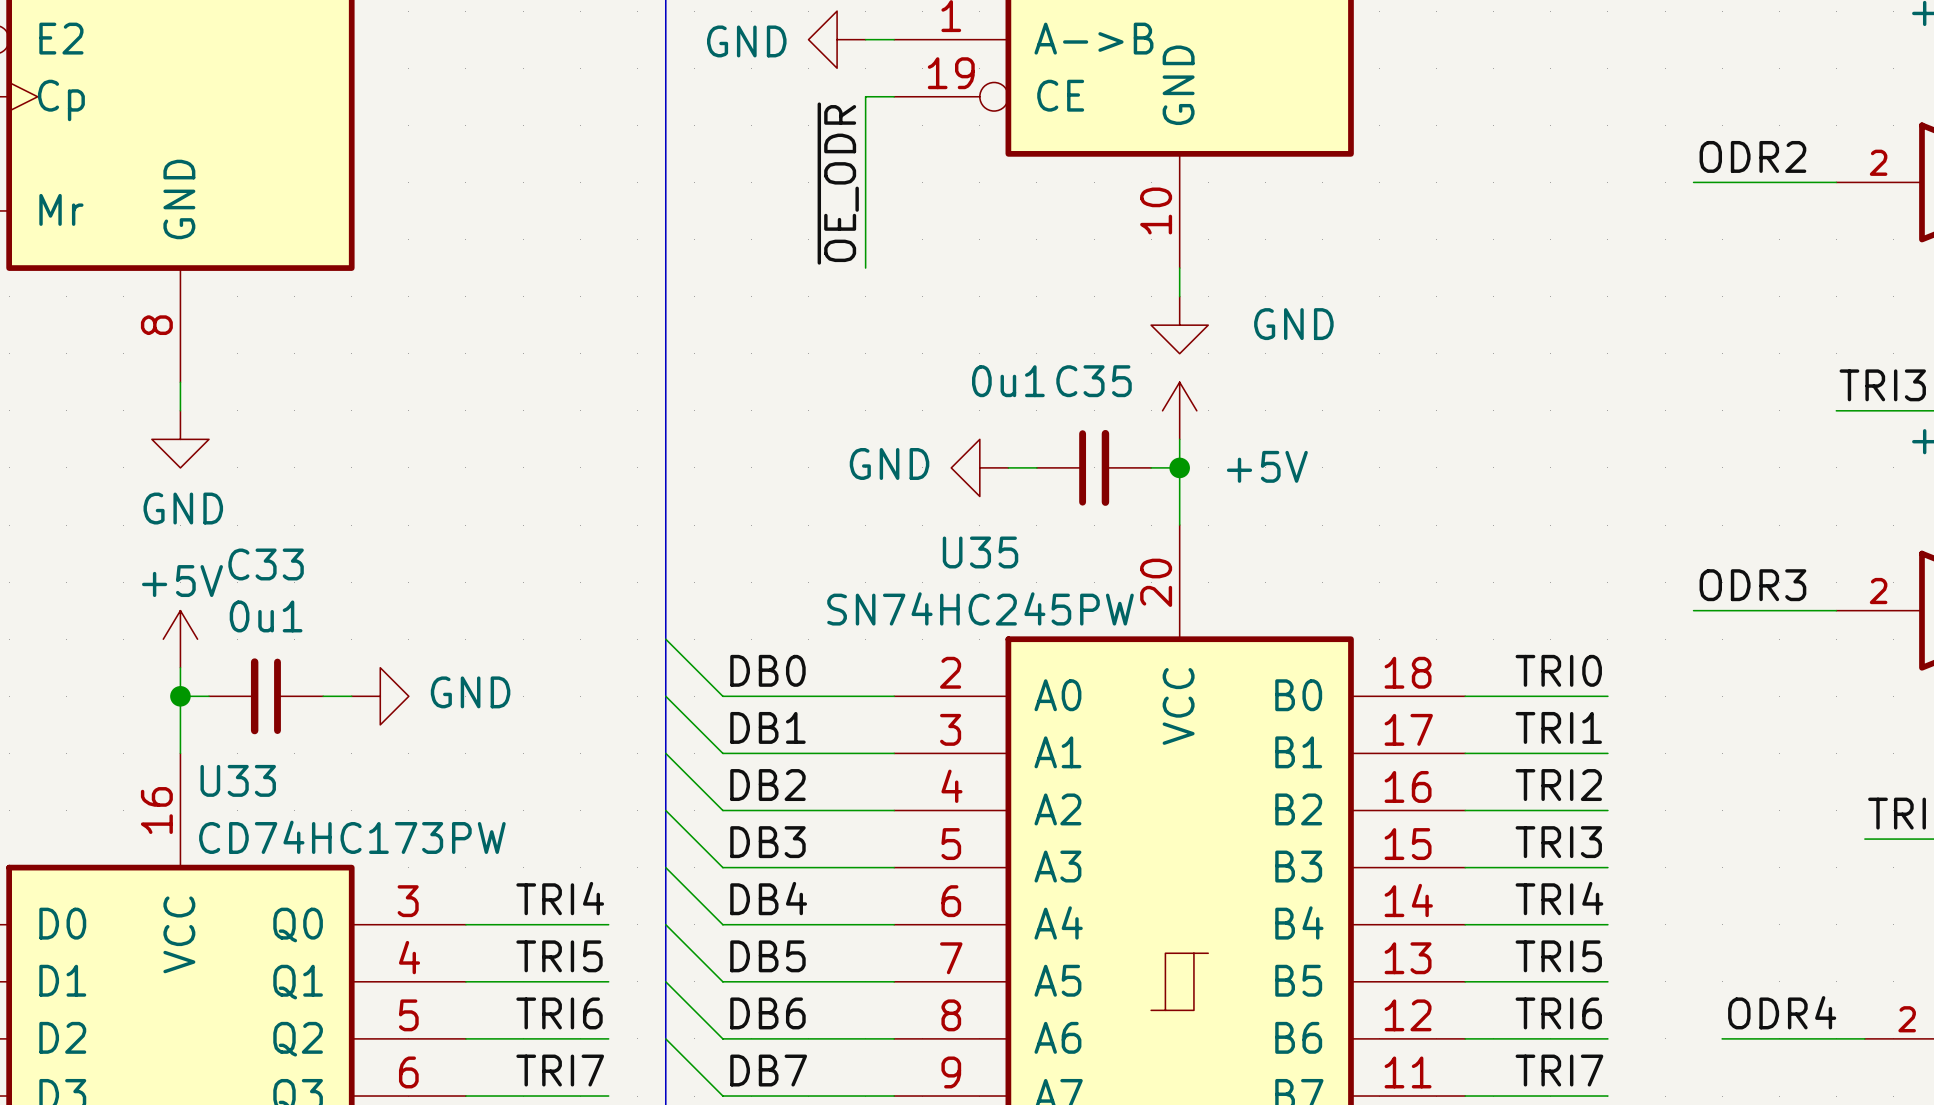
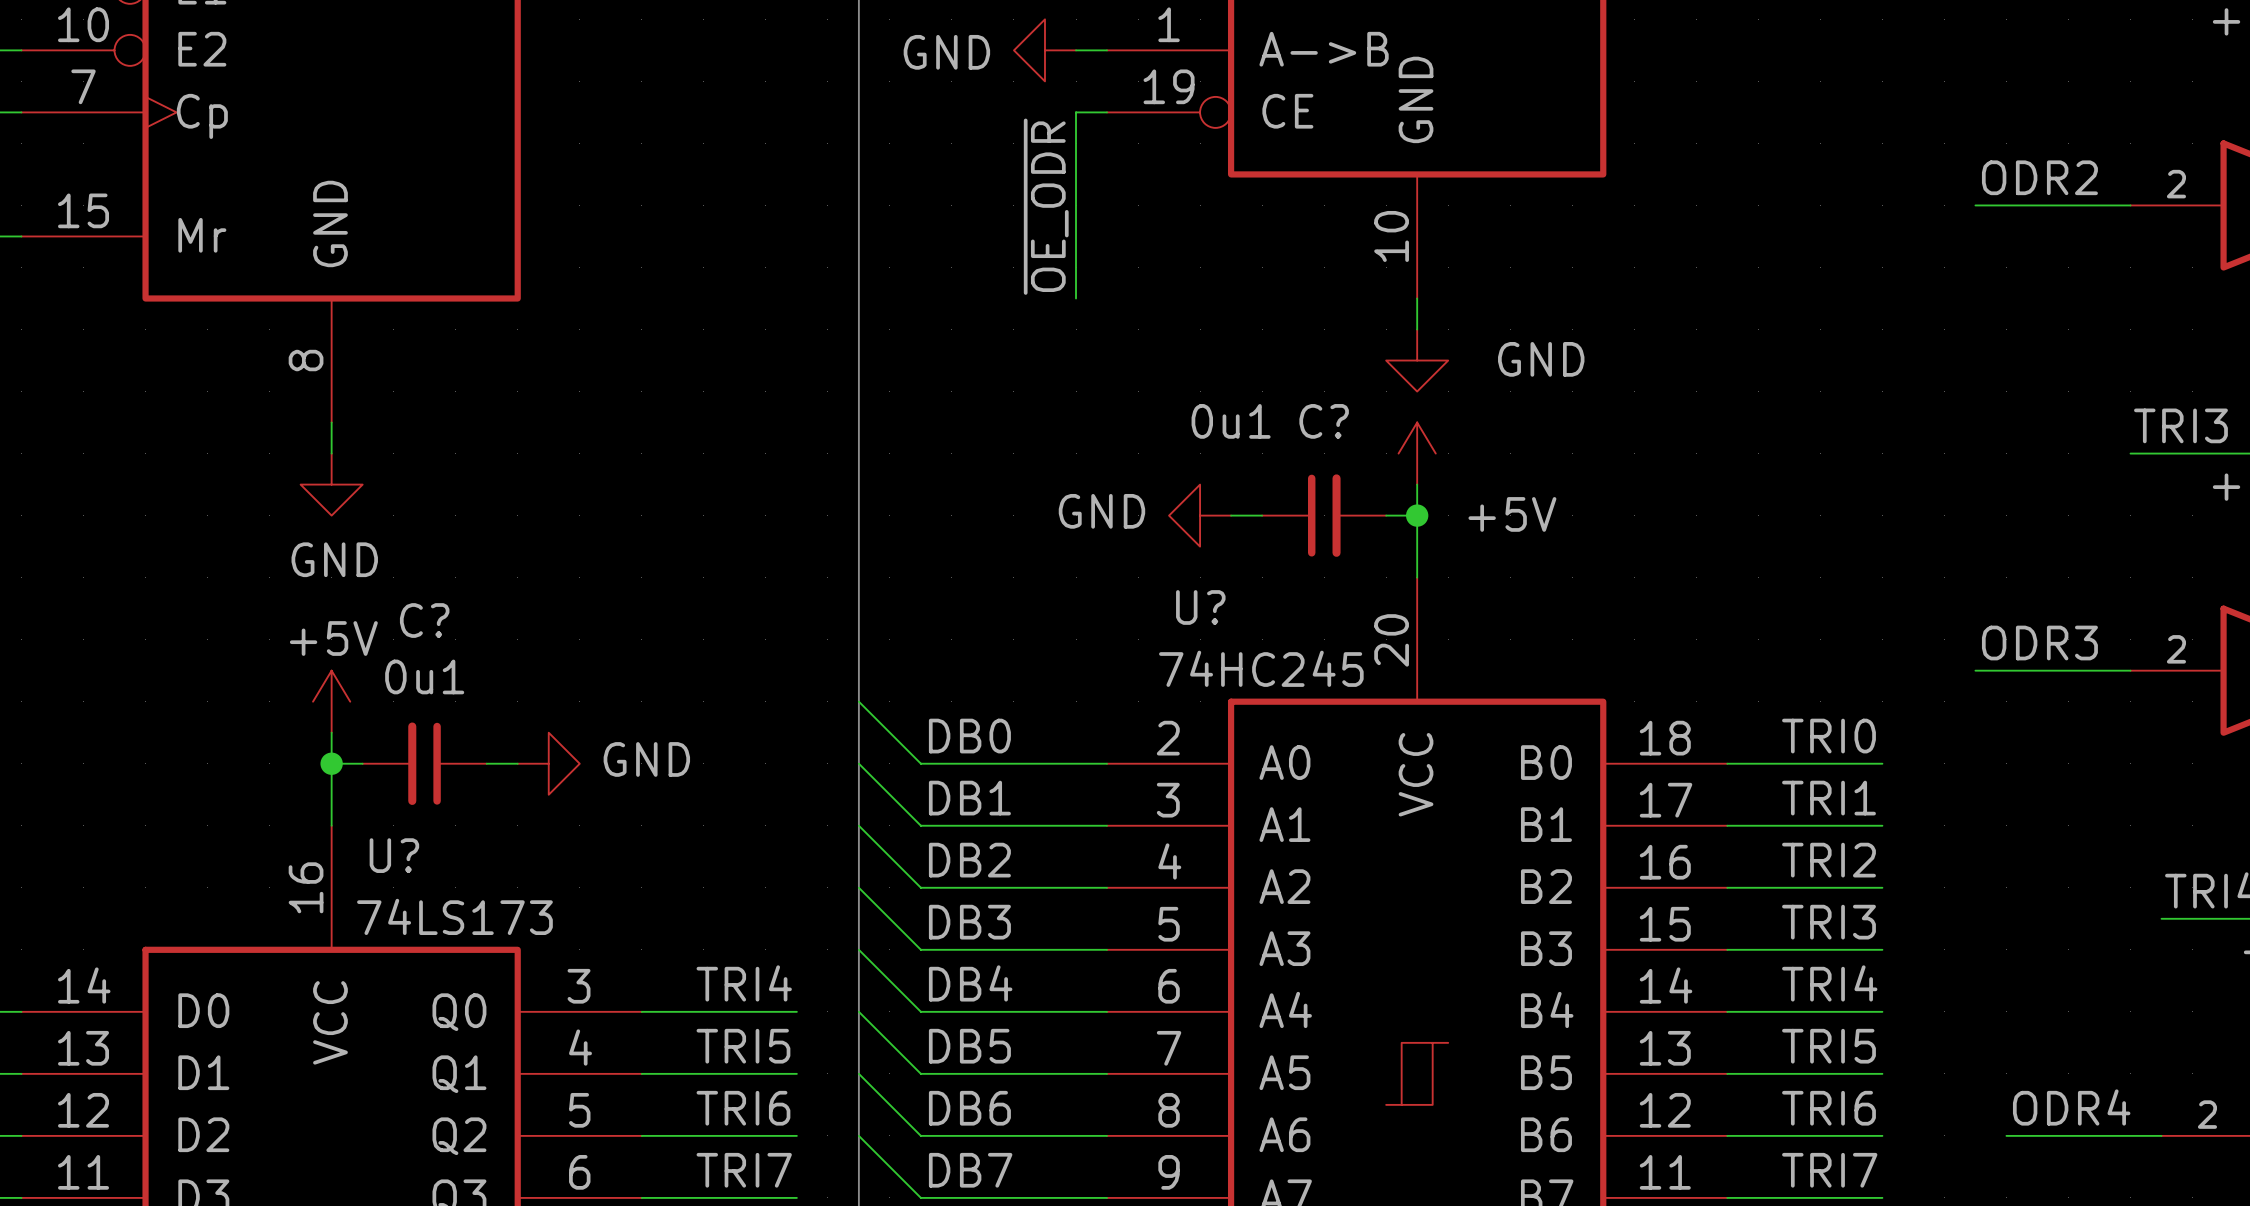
C35 name: C35 (1094, 381) -> C? (1324, 421)
U35 name: U35 (980, 552) -> U? (1200, 607)
C33 name: C33 (266, 564) -> C? (424, 620)
U35 value: SN74HC245PW (980, 608) -> 74HC245 (1261, 668)
U33 name: U33 (238, 780) -> U? (394, 855)
U33 value: CD74HC173PW (352, 837) -> 74LS173 (454, 916)

